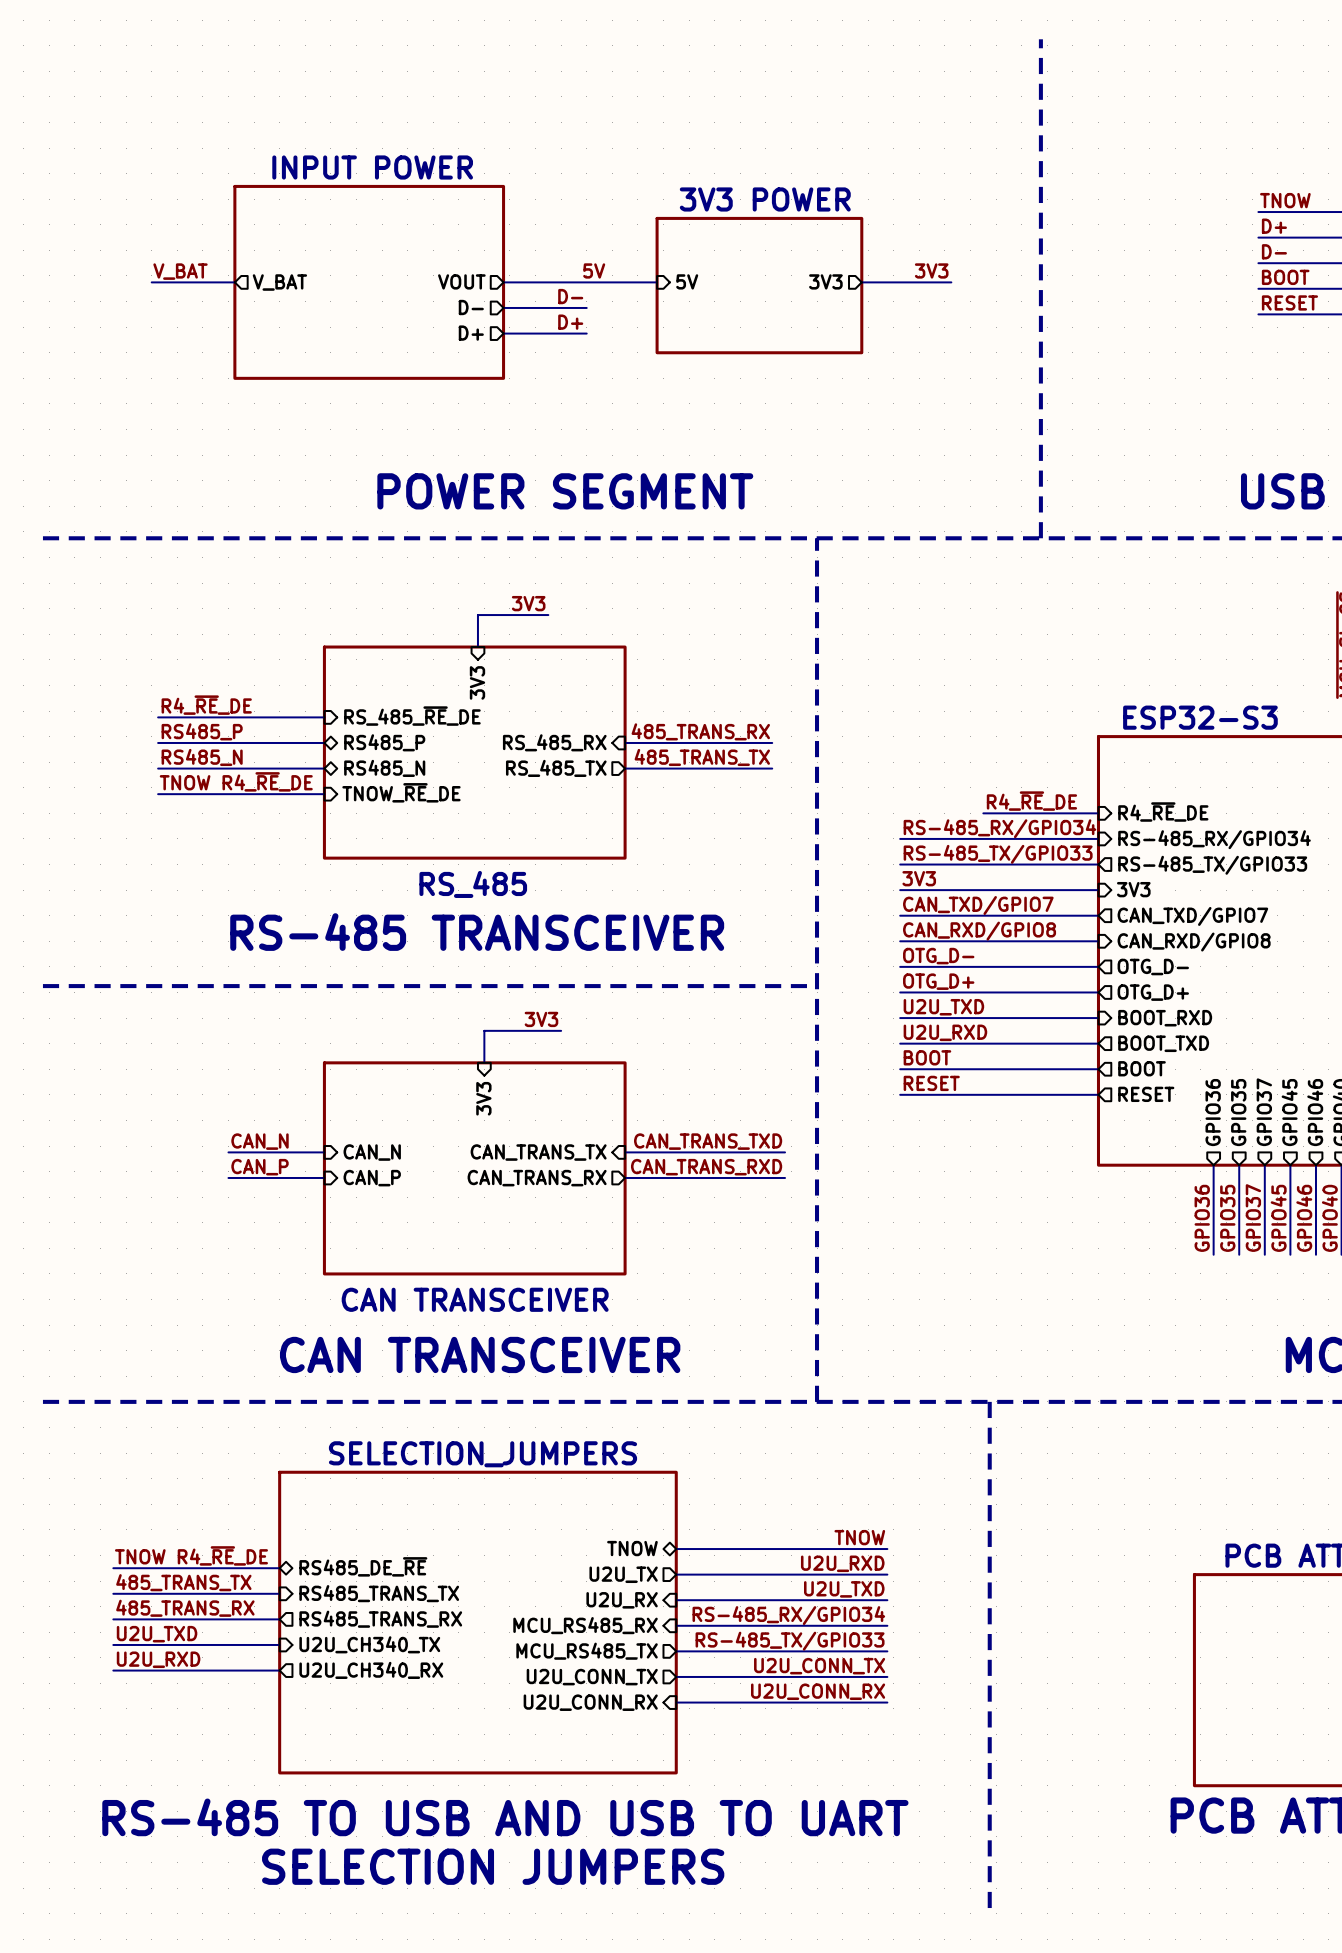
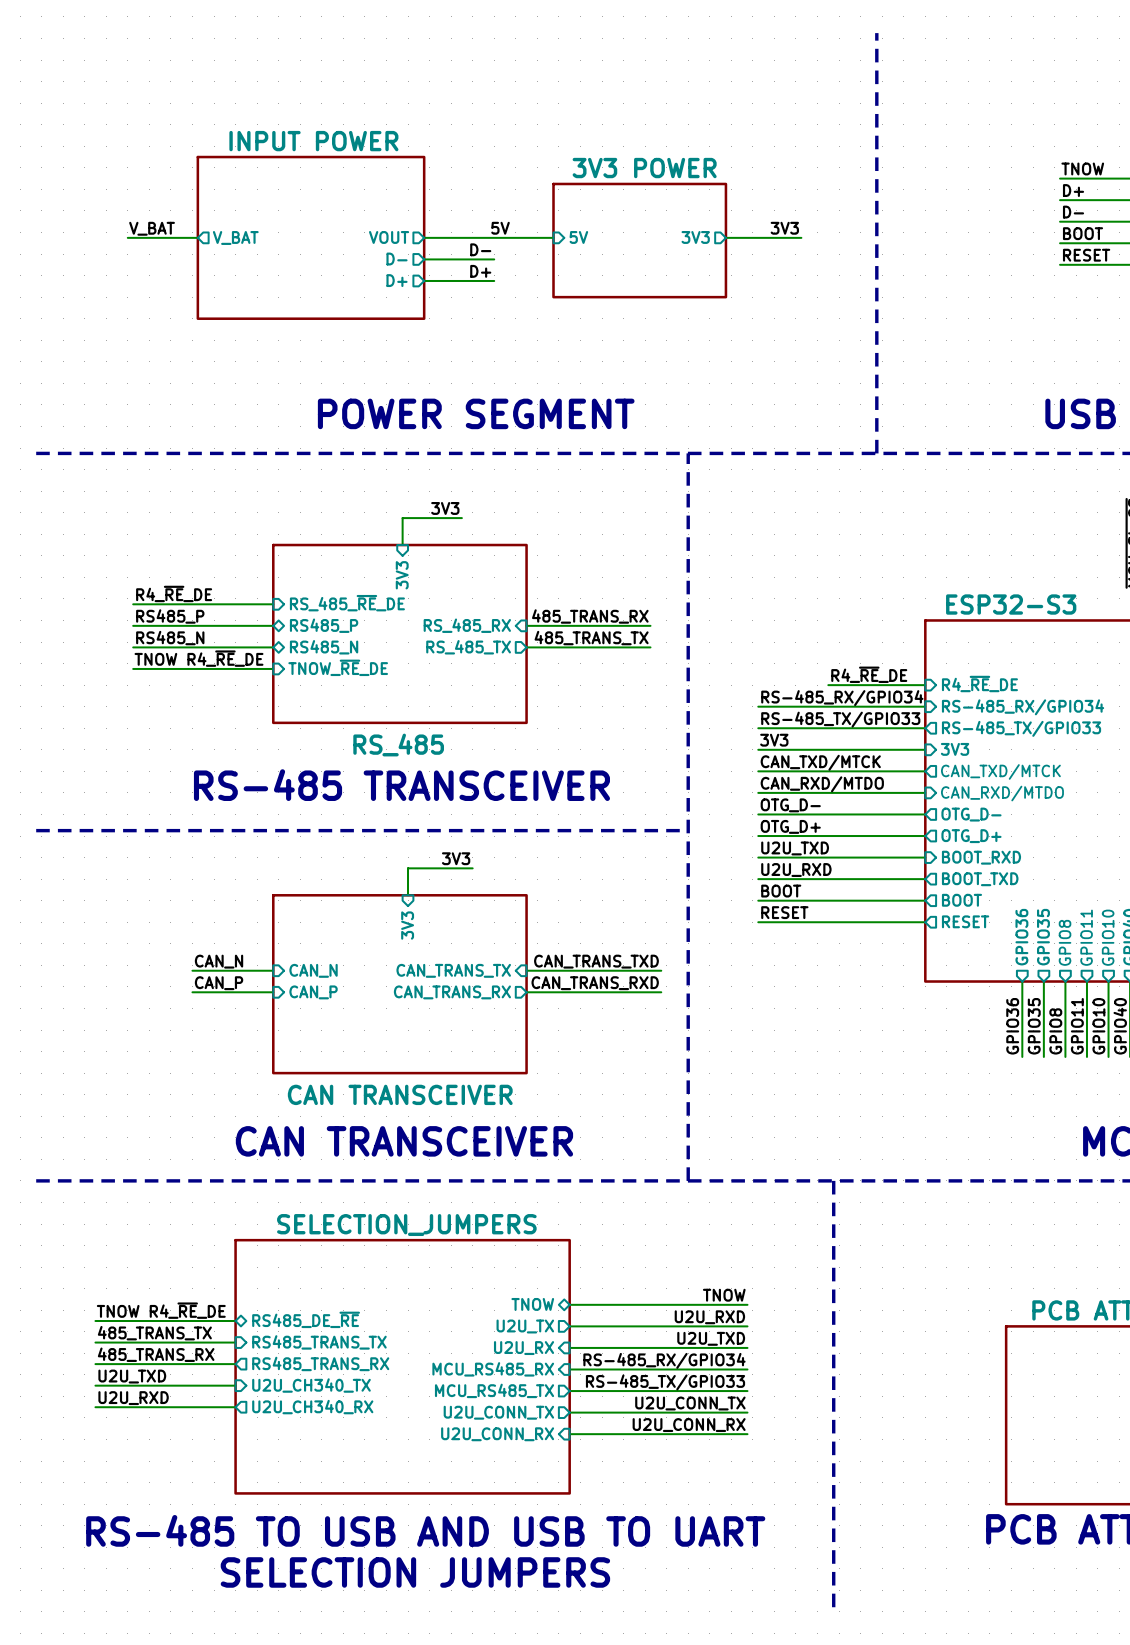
label: CAN_TXD/GPIO7 (978, 905) -> CAN_TXD/MTCK (820, 762)
sheet pin: CAN_TXD/GPIO7 (1192, 916) -> CAN_TXD/MTCK (1000, 771)
label: CAN_RXD/GPIO8 (979, 931) -> CAN_RXD/MTDO (822, 784)
sheet pin: CAN_RXD/GPIO8 (1194, 942) -> CAN_RXD/MTDO (1002, 793)
sheet pin: GPIO37 (1264, 1112) -> GPIO8 (1065, 942)
sheet pin: GPIO45 (1289, 1112) -> GPIO11 (1086, 937)
sheet pin: GPIO46 (1315, 1112) -> GPIO10 (1108, 937)
label: GPIO37 (1253, 1218) -> GPIO8 (1055, 1031)
label: GPIO45 (1278, 1218) -> GPIO11 (1077, 1026)
label: GPIO46 (1304, 1218) -> GPIO10 (1098, 1026)

